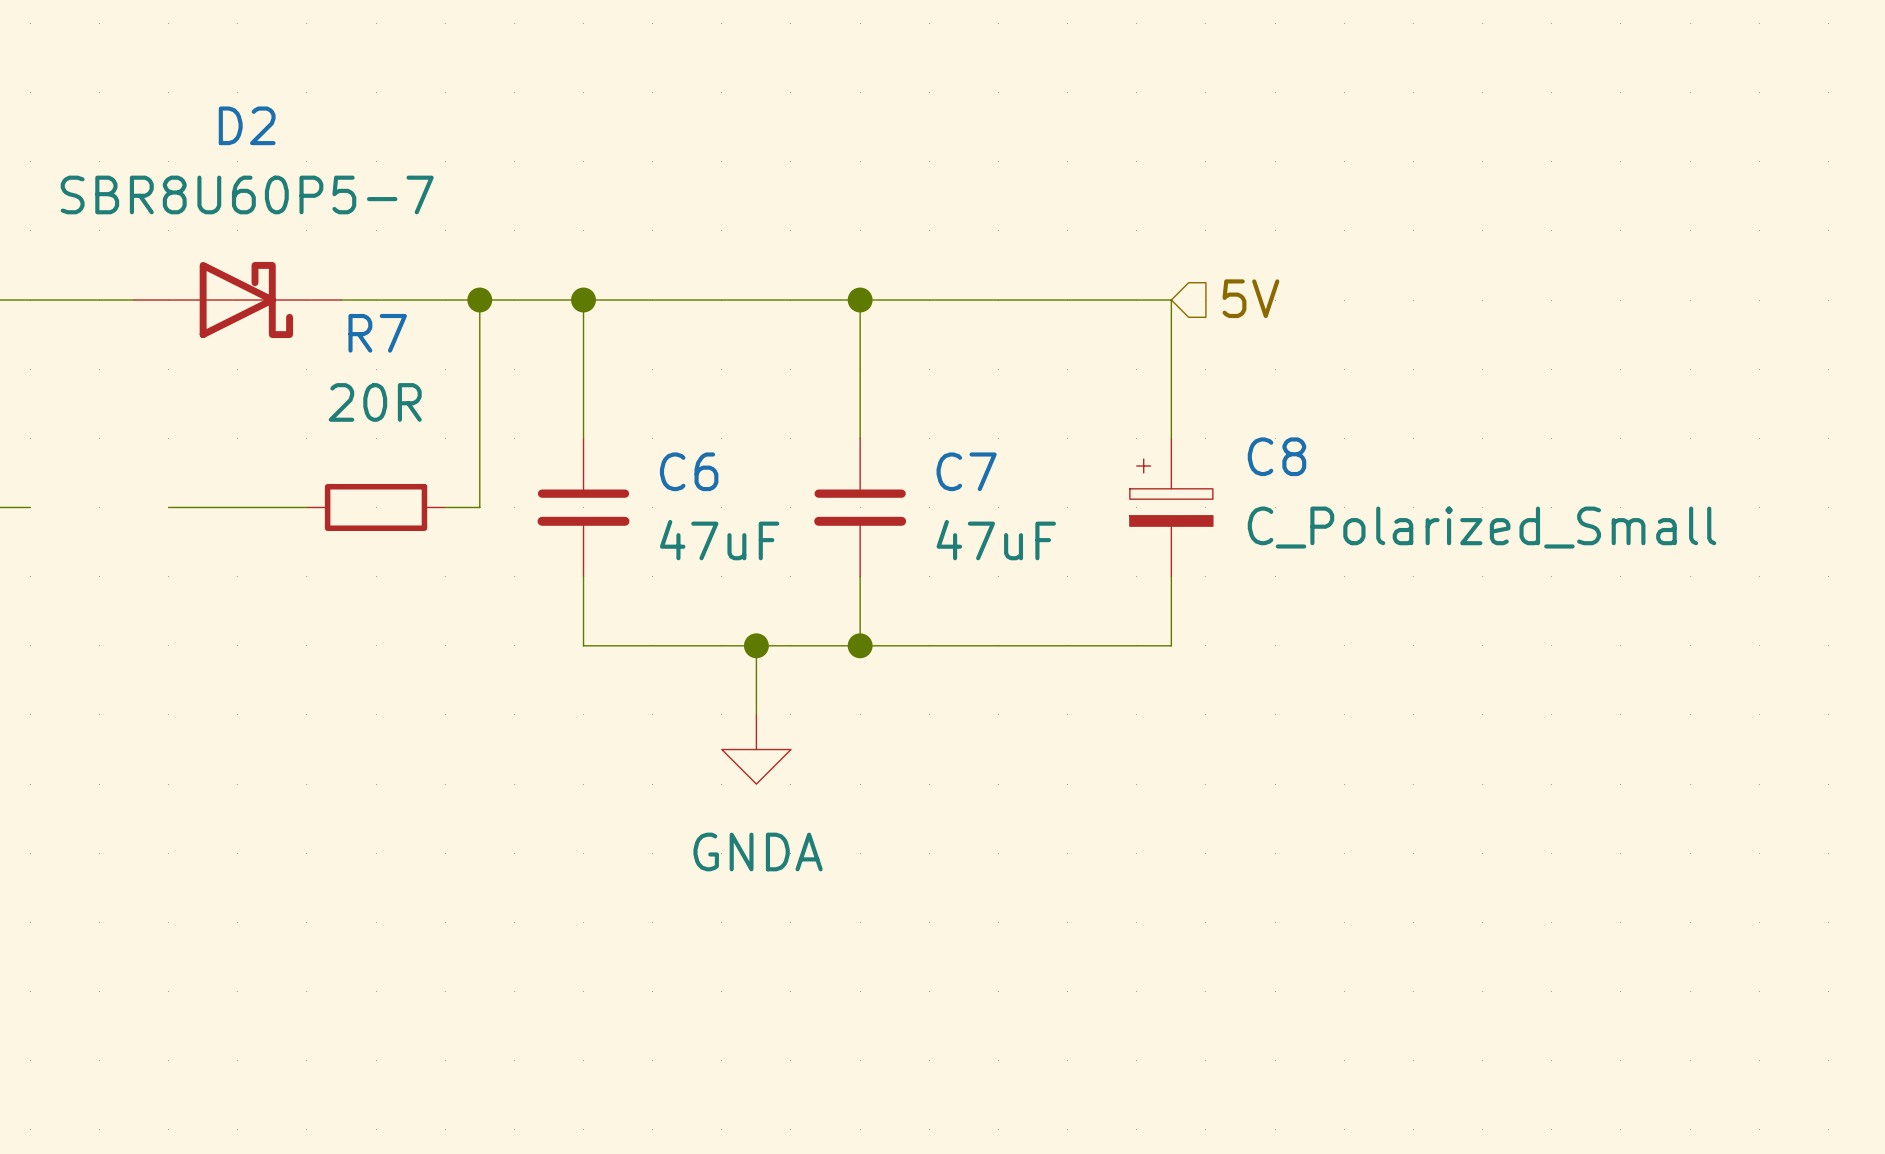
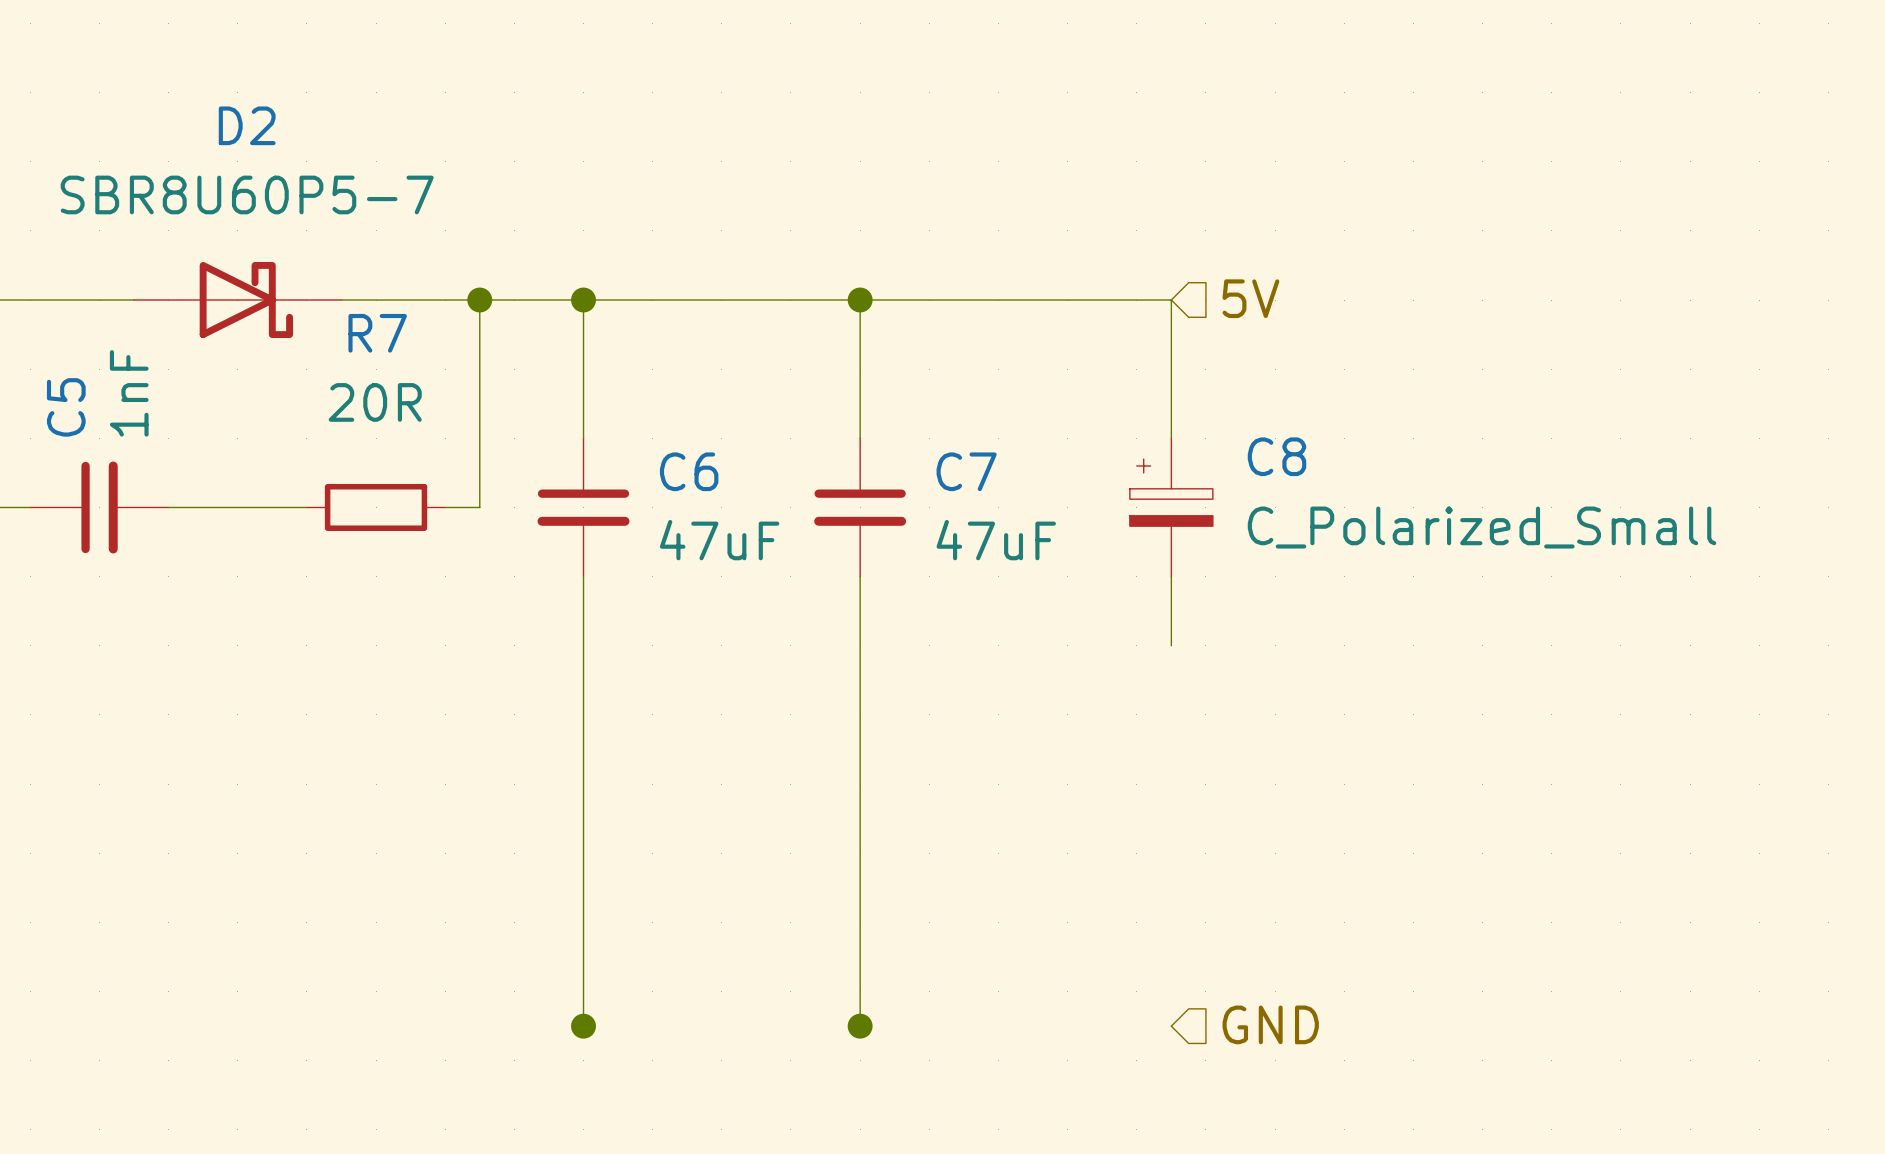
C5: none -> 1nF (99, 507)
wire: (583, 645) (1171, 645) -> (583, 645) (583, 1026)
wire: (756, 645) (756, 714) -> none
junction: (756, 645) -> none
wire: none -> (860, 645) (860, 1026)
junction: (860, 645) -> none
power symbol: GNDA (756, 749) -> none
hierarchical label: none -> GND (1270, 1024)
junction: none -> (583, 1026)
junction: none -> (860, 1026)

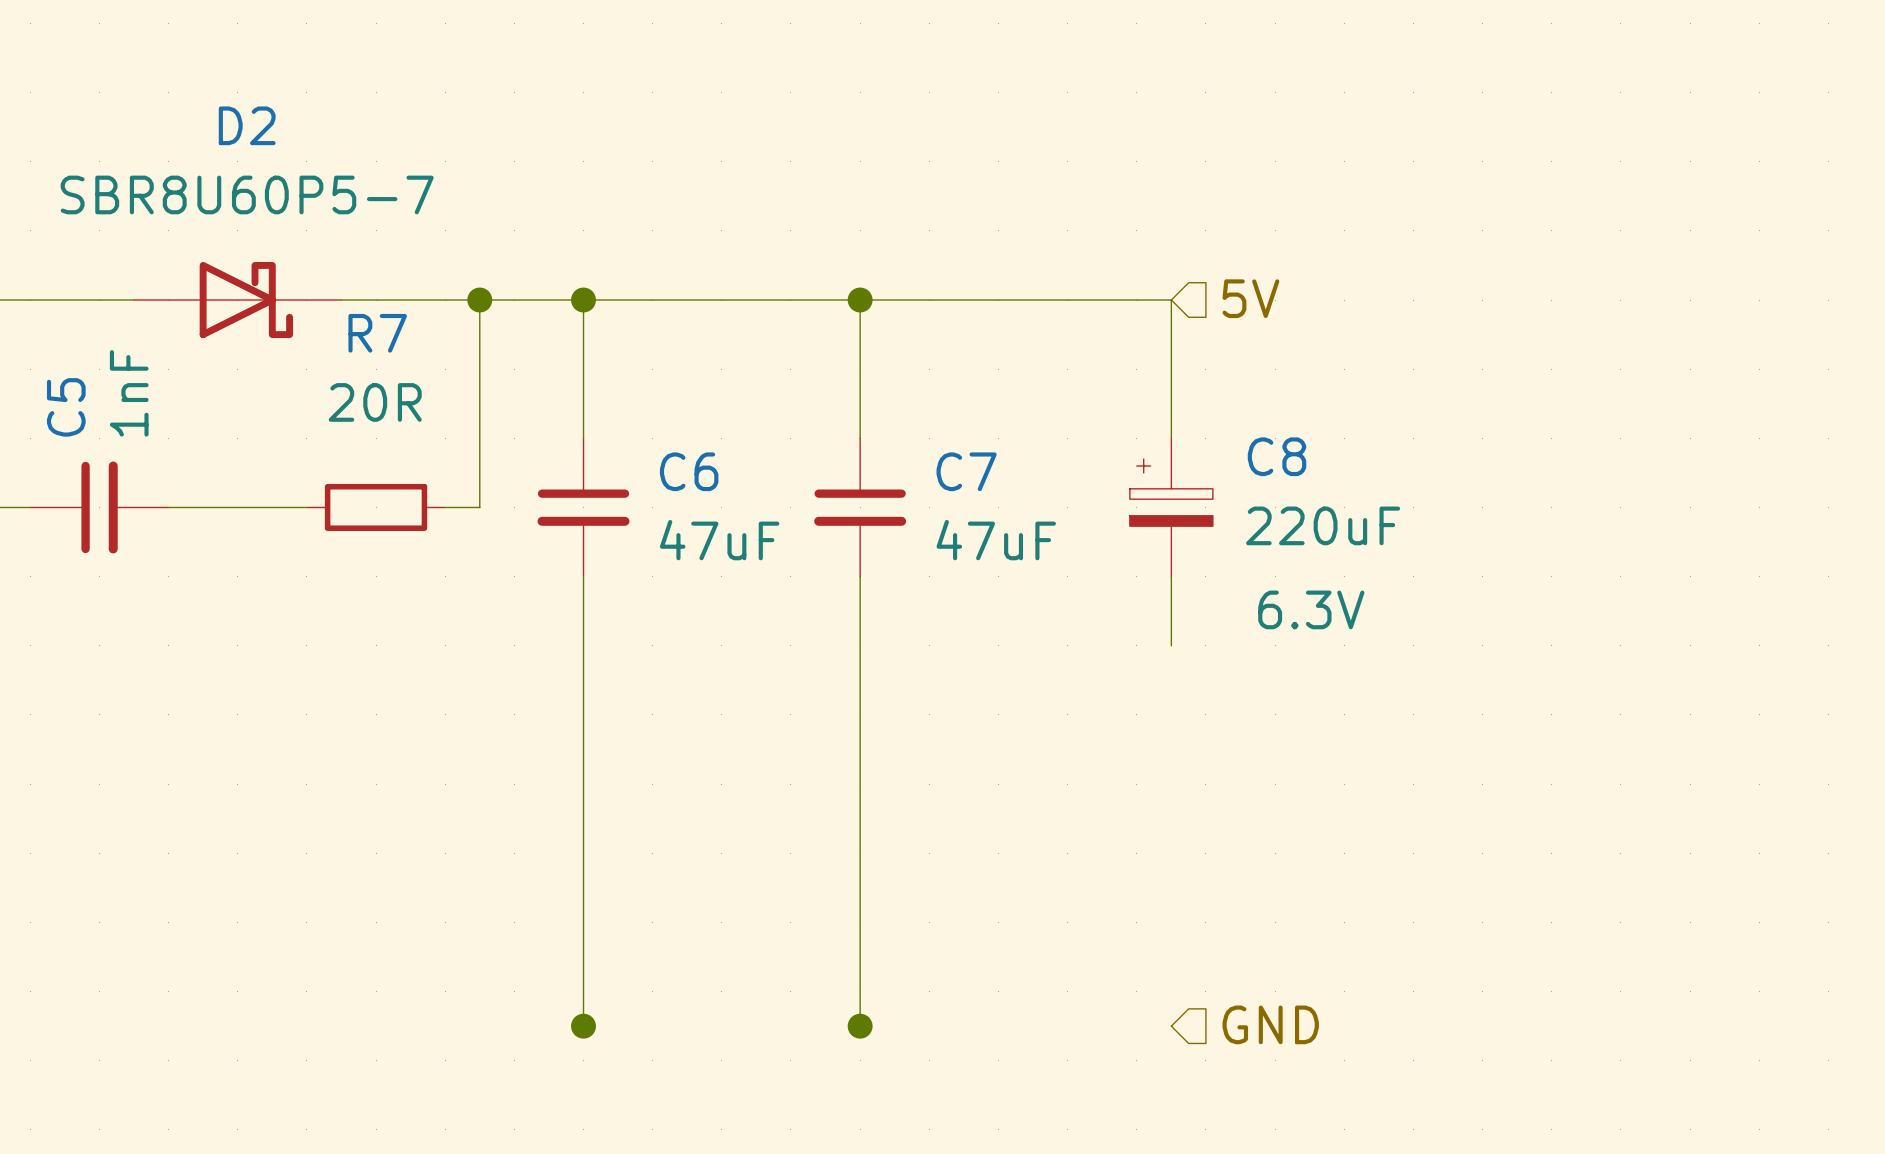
C8 value: C_Polarized_Small (1482, 527) -> 220uF (1323, 525)
C8 text: none -> 6.3V (1311, 609)

